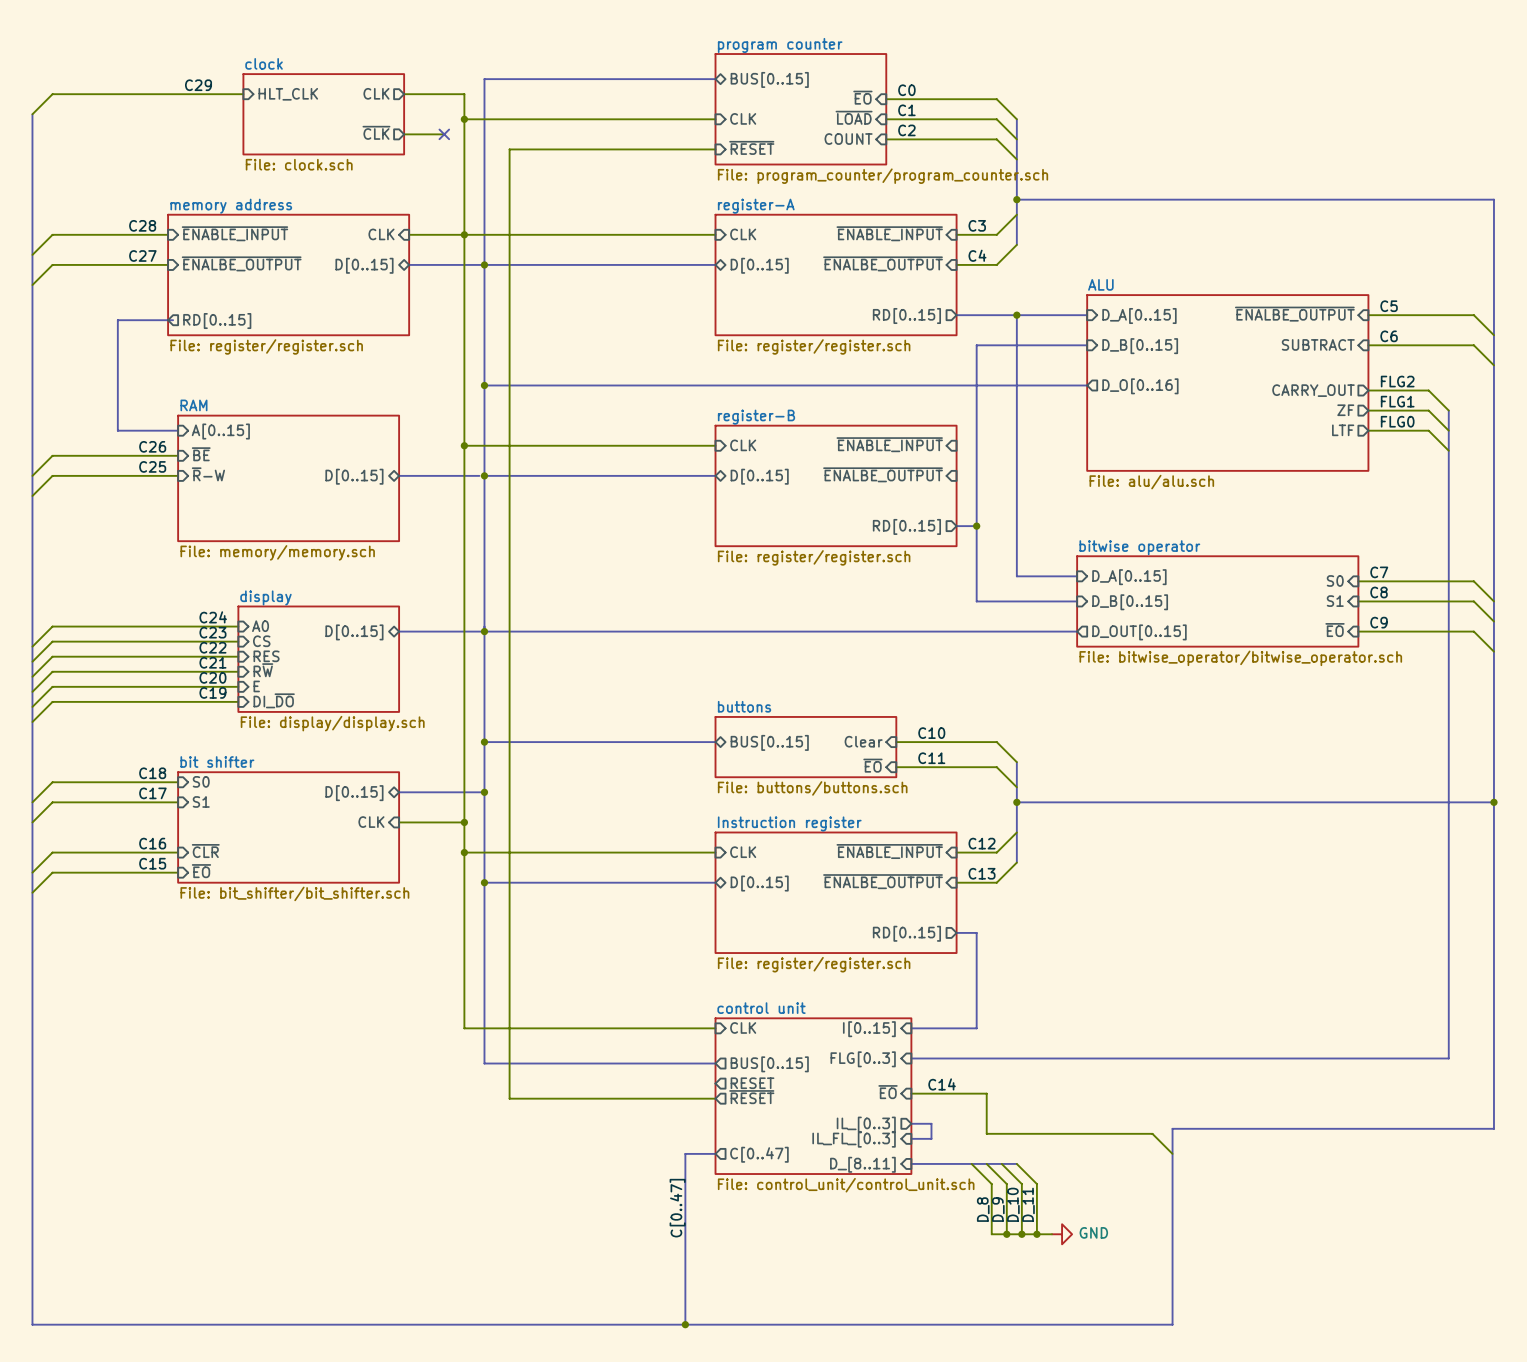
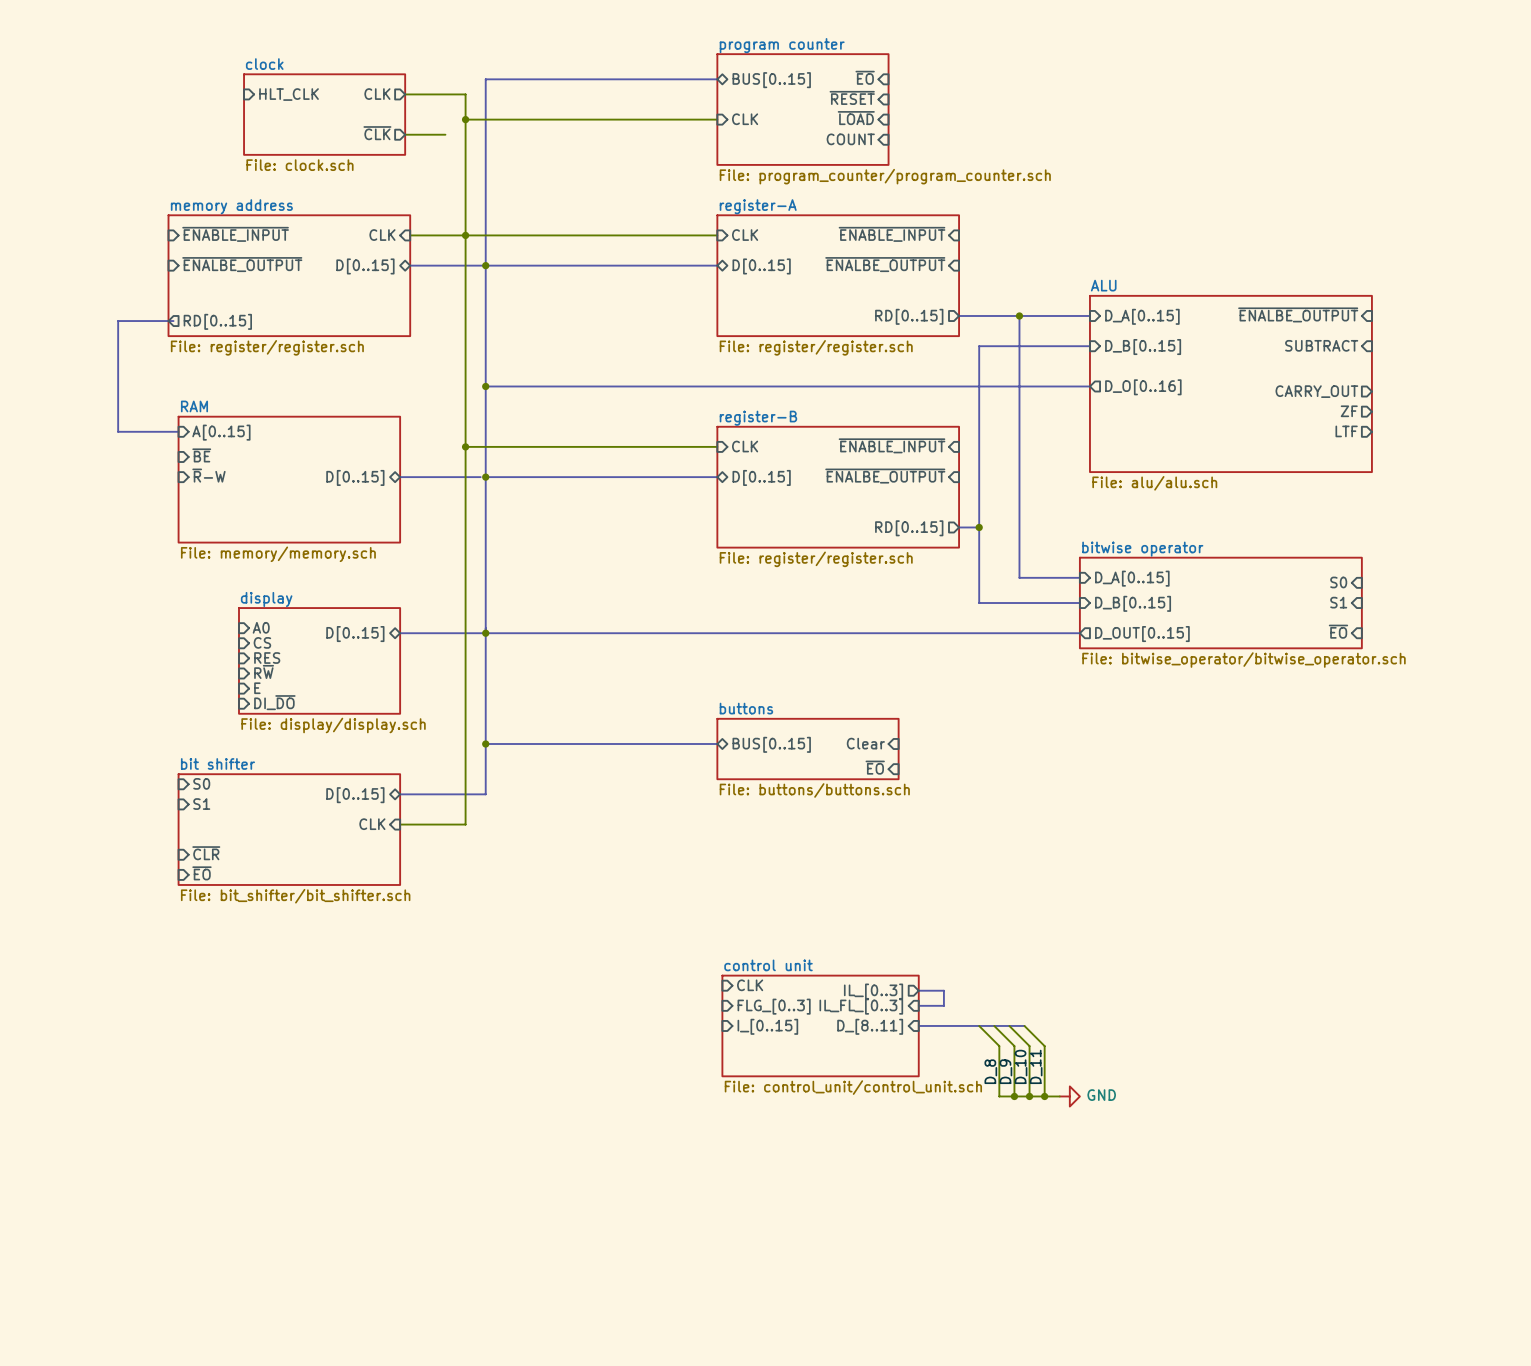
sheet pin: none -> ~{EO} (865, 77)
label: C29 (198, 85) -> none
label: C0 (906, 90) -> none
wire: (243, 94) (52, 94) (32, 114) -> none
sheet pin: ~{EO} (862, 97) -> ~{RESET} (852, 97)
wire: (886, 99) (996, 99) (1016, 119) -> none
label: C1 (906, 110) -> none
bus: (32, 114) (32, 1324) (1172, 1324) (1172, 1128) (1493, 1128) (1493, 199) (1016, 199) -> none
wire: (886, 119) (996, 119) (1016, 139) -> none
bus: (1016, 119) (1016, 244) -> none
label: C2 (906, 130) -> none
no-connect mark: (444, 134) -> none
wire: (886, 139) (996, 139) (1016, 159) -> none
sheet pin: ~{RESET} (751, 147) -> none
wire: (715, 149) (509, 149) (509, 1098) (715, 1098) -> none
junction: (1016, 199) -> none
wire: (1016, 214) (996, 234) (956, 234) -> none
label: C28 (142, 225) -> none
label: C3 (977, 225) -> none
wire: (168, 234) (52, 234) (32, 254) -> none
wire: (1016, 244) (996, 264) (956, 264) -> none
label: C27 (142, 255) -> none
label: C4 (977, 255) -> none
wire: (168, 264) (52, 264) (32, 285) -> none
label: C5 (1389, 306) -> none
wire: (1368, 315) (1473, 315) (1493, 335) -> none
label: C6 (1389, 336) -> none
wire: (1368, 345) (1473, 345) (1493, 365) -> none
label: FLG2 (1397, 381) -> none
wire: (1368, 390) (1428, 390) (1448, 410) -> none
label: FLG1 (1397, 401) -> none
wire: (1368, 410) (1428, 410) (1448, 430) -> none
bus: (1448, 410) (1448, 1058) (911, 1058) -> none
label: FLG0 (1397, 421) -> none
wire: (1368, 430) (1428, 430) (1448, 450) -> none
label: C26 (152, 446) -> none
wire: (178, 455) (52, 455) (32, 475) -> none
label: C25 (152, 466) -> none
wire: (178, 475) (52, 475) (32, 495) -> none
label: C7 (1379, 572) -> none
wire: (1358, 581) (1473, 581) (1493, 601) -> none
label: C8 (1379, 592) -> none
wire: (1358, 601) (1473, 601) (1493, 621) -> none
label: C24 (213, 617) -> none
label: C9 (1379, 622) -> none
wire: (238, 626) (52, 626) (32, 646) -> none
wire: (1358, 631) (1473, 631) (1493, 651) -> none
label: C23 (212, 632) -> none
wire: (238, 641) (52, 641) (32, 661) -> none
label: C22 (212, 647) -> none
wire: (238, 656) (52, 656) (32, 676) -> none
label: C21 (212, 662) -> none
wire: (238, 671) (52, 671) (32, 691) -> none
label: C20 (212, 677) -> none
wire: (238, 686) (52, 686) (32, 706) -> none
label: C19 (212, 692) -> none
wire: (238, 701) (52, 701) (32, 721) -> none
label: C10 (931, 733) -> none
wire: (896, 742) (996, 742) (1016, 762) -> none
label: C11 (931, 758) -> none
bus: (1016, 762) (1016, 862) -> none
wire: (896, 767) (996, 767) (1016, 787) -> none
label: C18 (152, 773) -> none
wire: (178, 782) (52, 782) (32, 802) -> none
bus: (484, 792) (484, 1063) (715, 1063) -> none
junction: (484, 792) -> none
label: C17 (152, 793) -> none
wire: (178, 802) (52, 802) (32, 822) -> none
bus: (1016, 802) (1493, 802) -> none
junction: (1016, 802) -> none
junction: (1493, 802) -> none
wire: (464, 822) (464, 1028) (715, 1028) -> none
junction: (464, 822) -> none
wire: (1016, 832) (996, 852) (956, 852) -> none
label: C16 (152, 843) -> none
label: C12 (982, 843) -> none
sheet pin: ~{ENABLE_INPUT} (889, 851) -> none
wire: (178, 852) (52, 852) (32, 872) -> none
wire: (464, 852) (715, 852) -> none
junction: (464, 852) -> none
sheet pin: CLK (743, 852) -> none
wire: (1016, 862) (996, 882) (956, 882) -> none
label: C15 (152, 863) -> none
wire: (178, 872) (52, 872) (32, 892) -> none
label: C13 (982, 873) -> none
sheet pin: ~{ENALBE_OUTPUT} (883, 881) -> none
bus: (484, 882) (715, 882) -> none
junction: (484, 882) -> none
sheet pin: D[0..15] (759, 883) -> none
sheet Instruction register: File: register/register.sch (836, 892) -> none
bus: (956, 932) (976, 932) (976, 1028) (911, 1028) -> none
sheet pin: RD[0..15] (906, 933) -> none
bus: none -> (918, 990) (943, 990) (943, 1005) (918, 1005)
sheet pin: none -> FLG_[0..3] (774, 1006)
sheet control unit: none -> File: control_unit/control_unit.sch (820, 1025)
sheet pin position: CLK (743, 1027) -> CLK (750, 985)
sheet pin: I[0..15] (869, 1029) -> I_[0..15] (767, 1026)
sheet pin: FLG[0..3] (863, 1059) -> none
sheet pin: BUS[0..15] (769, 1064) -> none
sheet pin: RESET (752, 1083) -> none
label: C14 (942, 1084) -> none
sheet pin: ~{EO} (888, 1092) -> none
wire: (911, 1093) (986, 1093) (986, 1133) (1152, 1133) (1172, 1153) -> none
junction: none -> (1014, 1096)
junction: none -> (1029, 1096)
junction: none -> (1044, 1096)
sheet control unit: File: control_unit/control_unit.sch (813, 1096) -> none
sheet pin: ~{RESET} (751, 1097) -> none
bus: (911, 1123) (931, 1123) (931, 1138) (911, 1138) -> none
sheet pin position: IL_[0..3] (866, 1124) -> IL_[0..3] (873, 991)
sheet pin position: IL_FL_[0..3] (854, 1139) -> IL_FL_[0..3] (861, 1006)
bus: (715, 1153) (685, 1153) (685, 1324) -> none
sheet pin: C[0..47] (759, 1154) -> none
bus: (911, 1163) (1016, 1163) -> (918, 1025) (1024, 1025)
wire: (971, 1163) (991, 1184) (991, 1234) (1052, 1234) -> (979, 1025) (999, 1046) (999, 1096) (1059, 1096)
wire: (986, 1163) (1006, 1184) (1006, 1234) -> (994, 1025) (1014, 1046) (1014, 1096)
wire: (1001, 1163) (1021, 1184) (1021, 1234) -> (1009, 1025) (1029, 1046) (1029, 1096)
wire: (1016, 1163) (1036, 1184) (1036, 1234) -> (1024, 1025) (1044, 1046) (1044, 1096)
sheet pin position: D_[8..11] (862, 1164) -> D_[8..11] (870, 1026)
label position: D_10 (1013, 1204) -> D_10 (1021, 1066)
label position: D_11 (1028, 1204) -> D_11 (1036, 1066)
label: C[0..47] (677, 1208) -> none
label position: D_8 (983, 1209) -> D_8 (990, 1071)
label position: D_9 (998, 1209) -> D_9 (1005, 1071)
junction: (1006, 1234) -> none
junction: (1021, 1234) -> none
junction: (1036, 1234) -> none
power symbol position: GND (1062, 1234) -> GND (1069, 1096)
junction: (685, 1324) -> none

